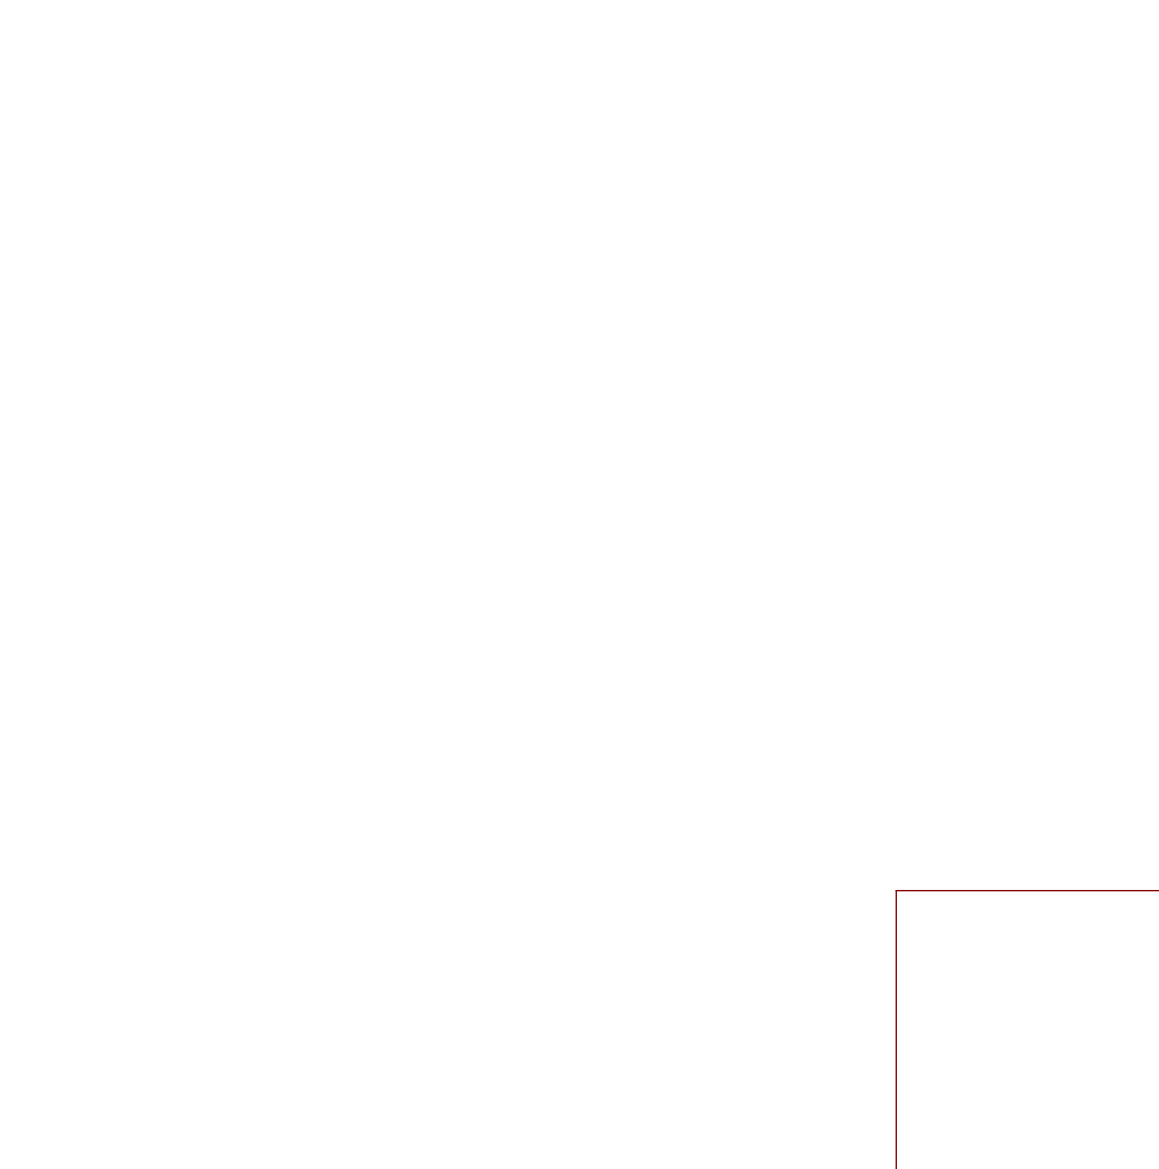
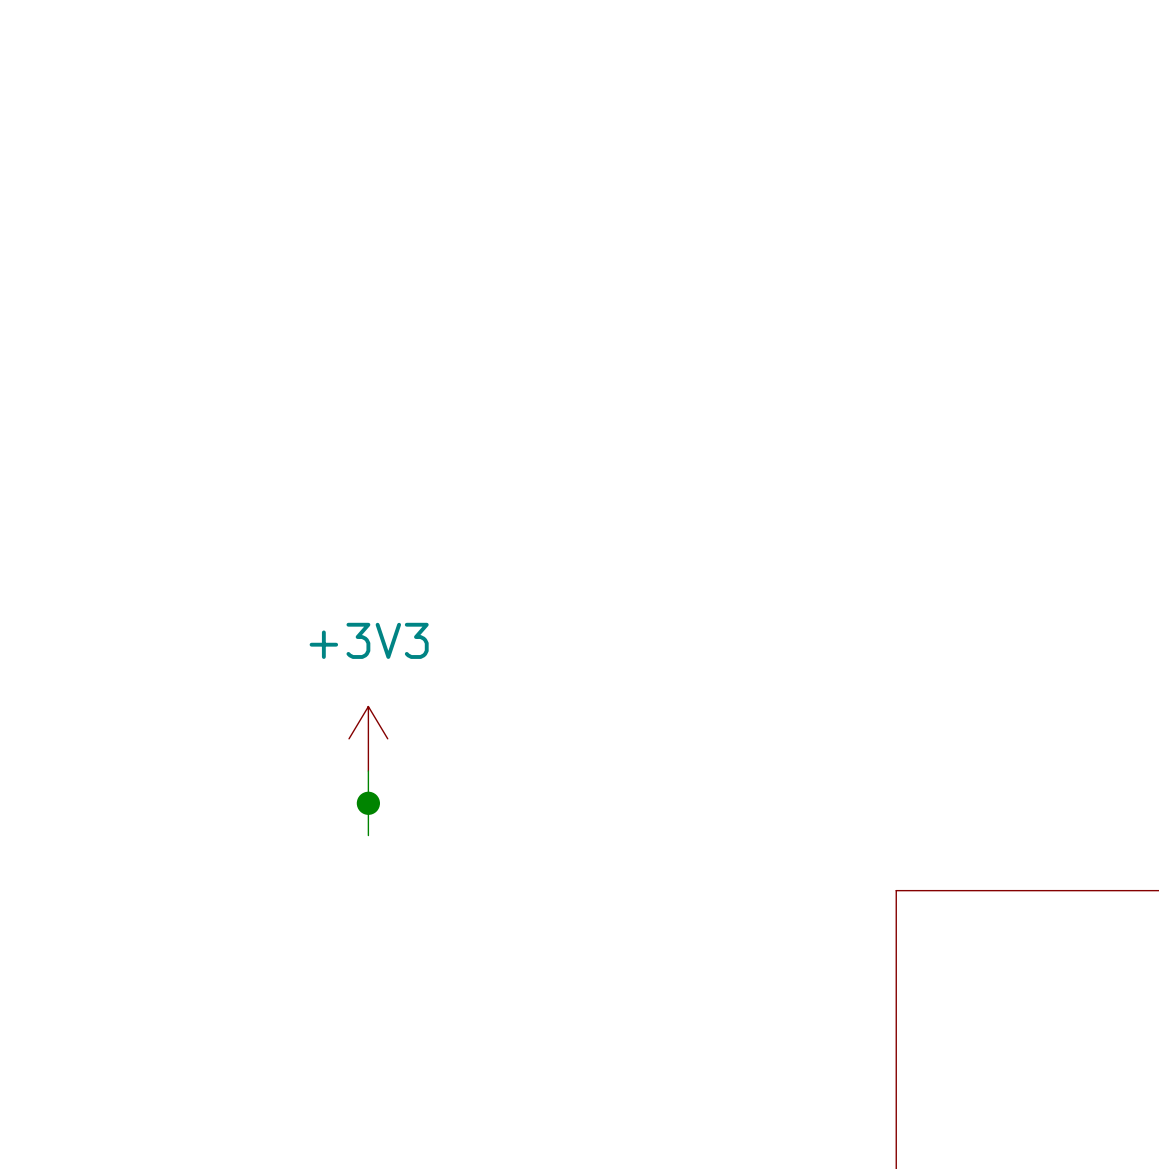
power symbol: none -> +3V3 (368, 738)
wire: none -> (368, 771) (368, 835)
junction: none -> (368, 803)

